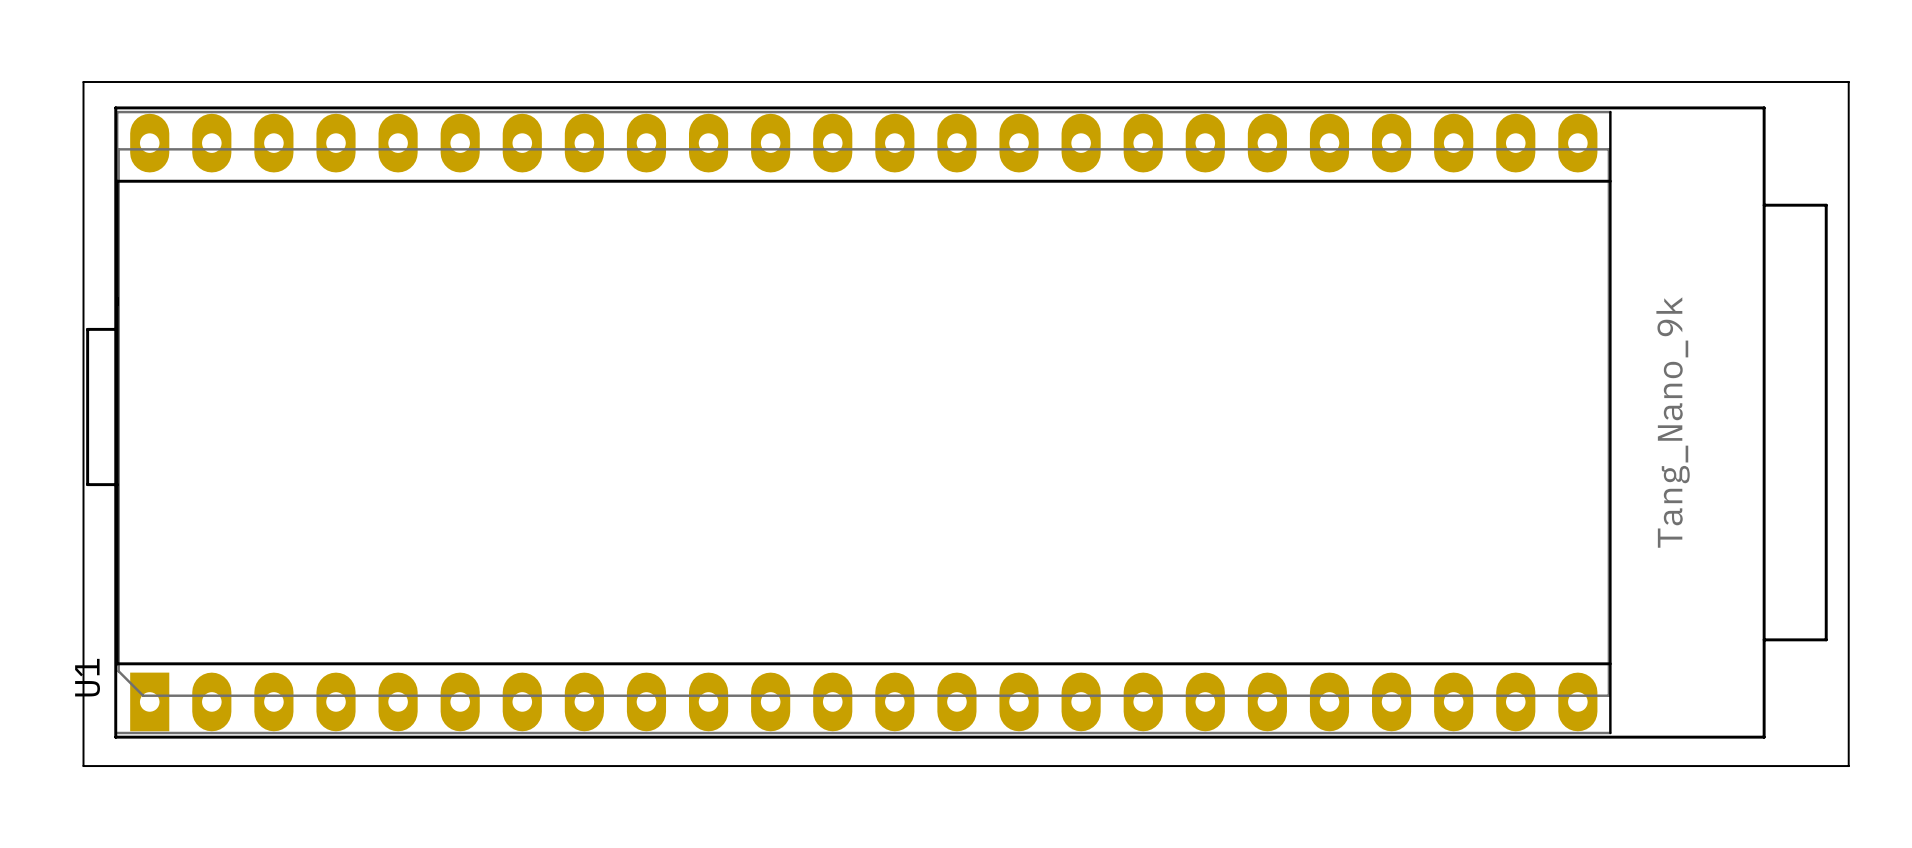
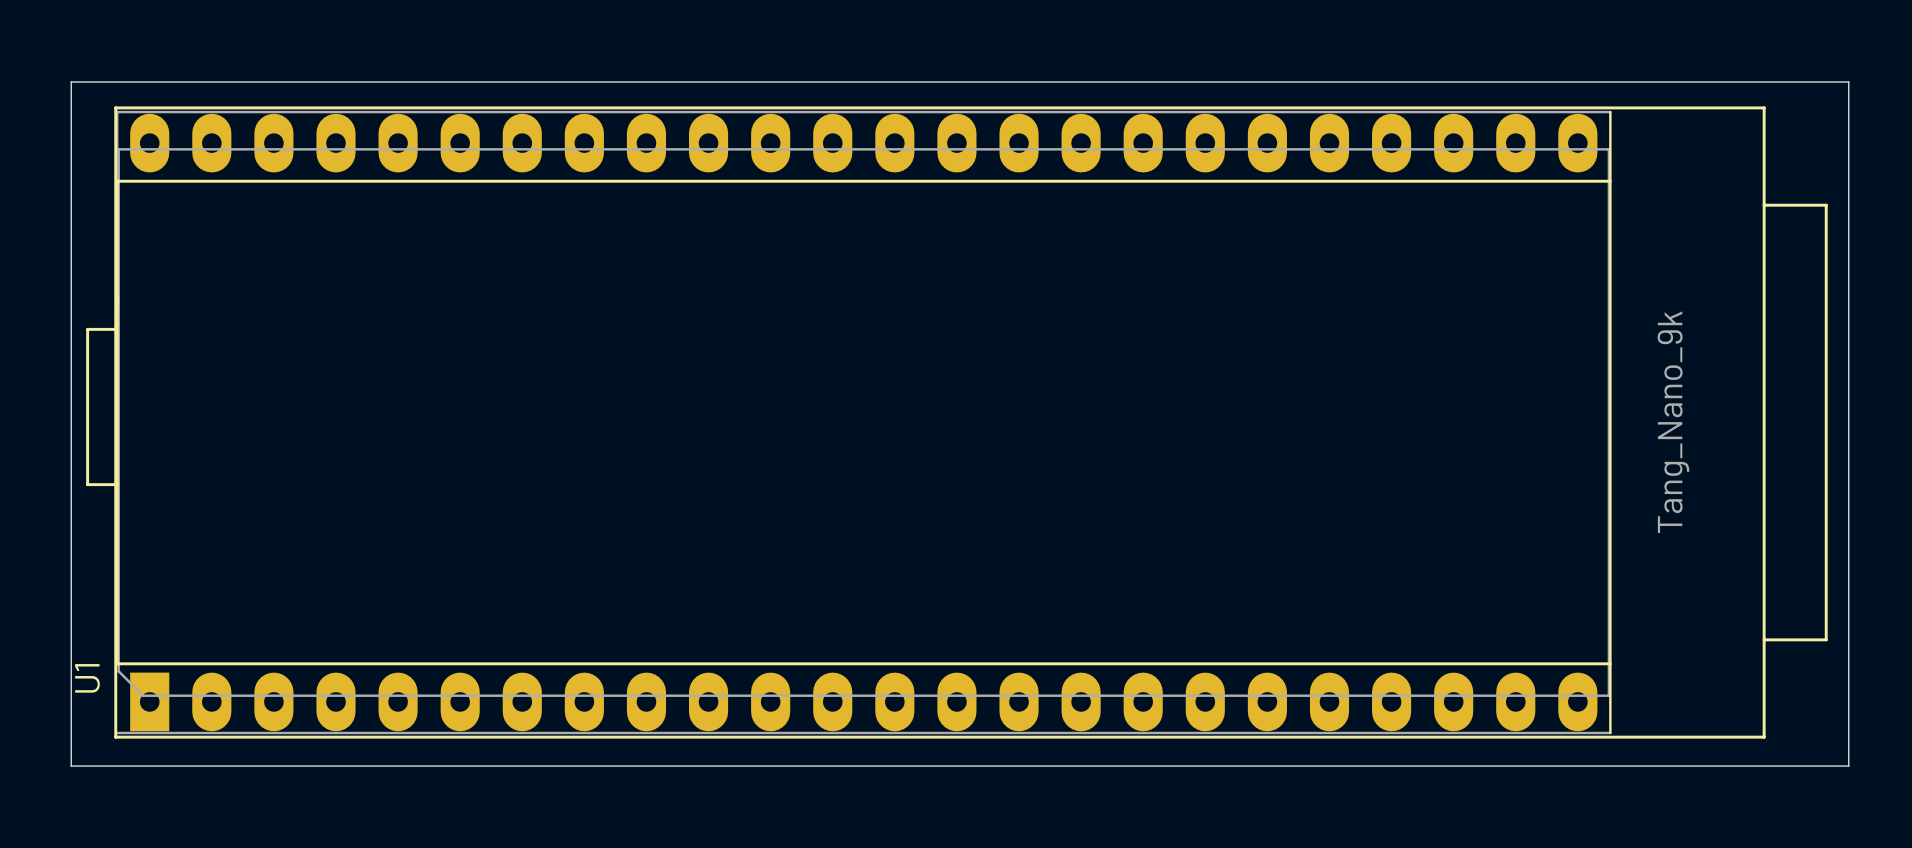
board edge: (83, 82) (83, 766) -> (83, 82) (71, 82) (71, 766) (83, 766)

